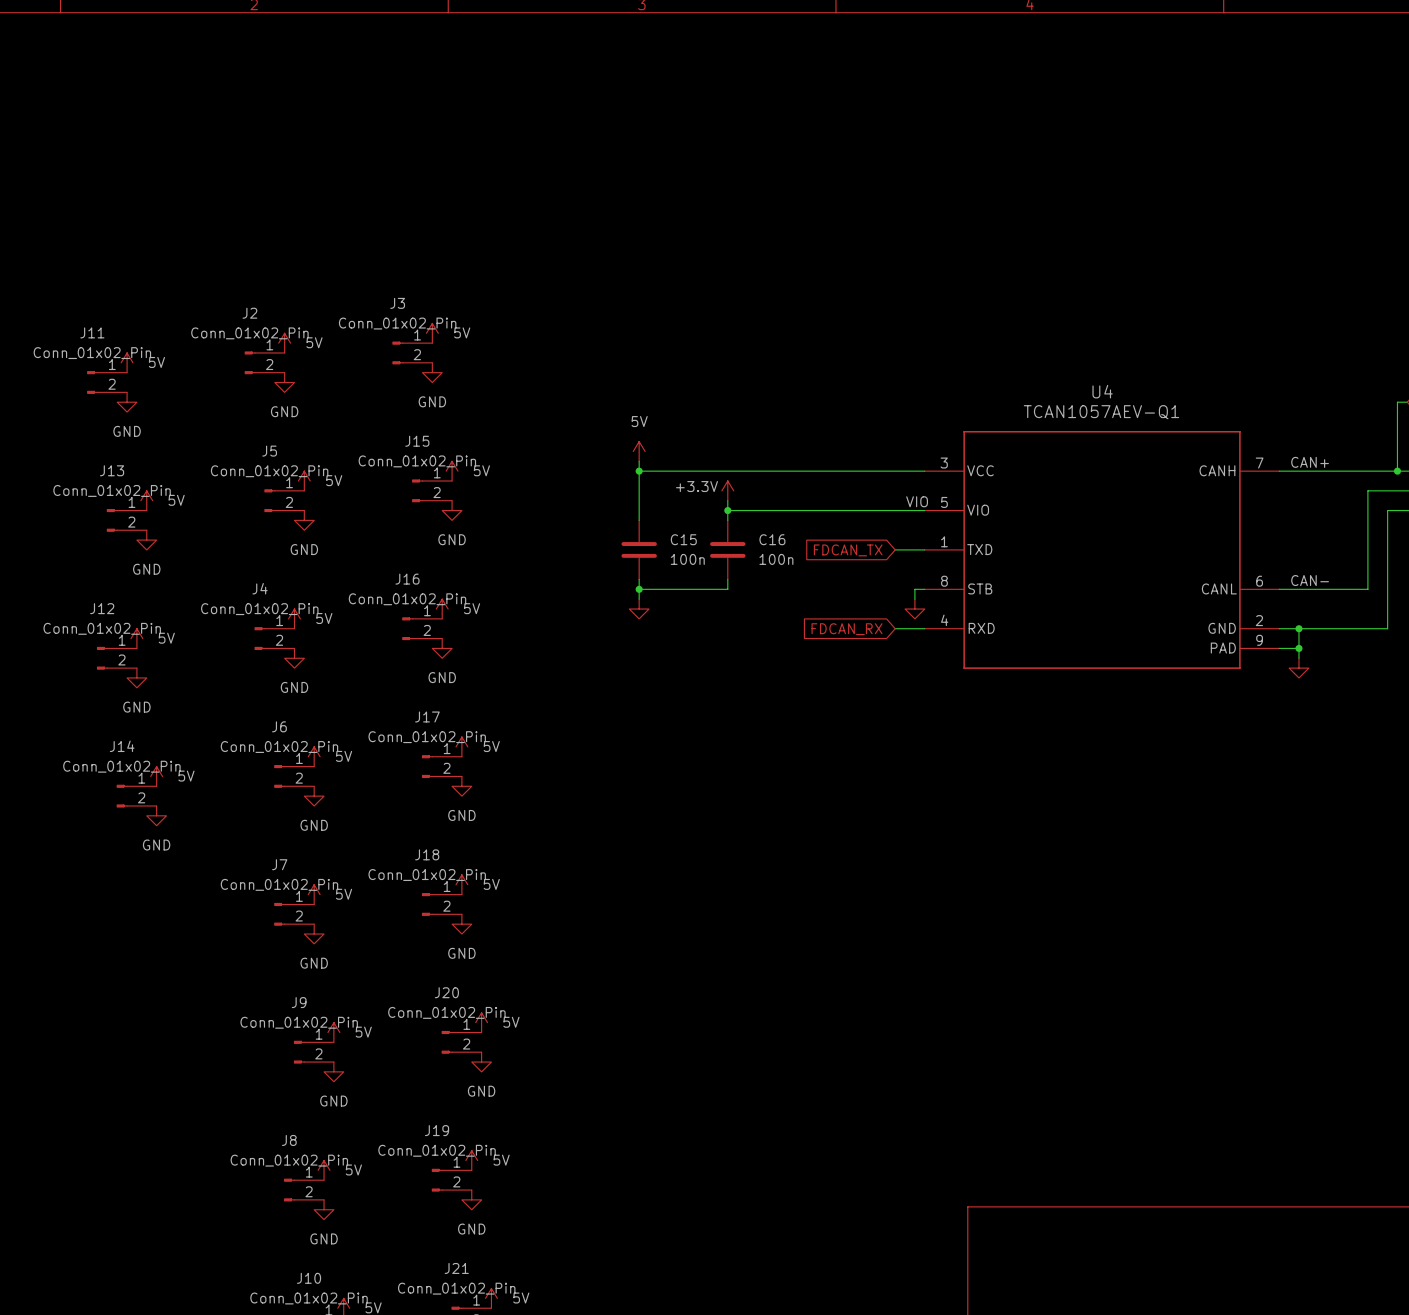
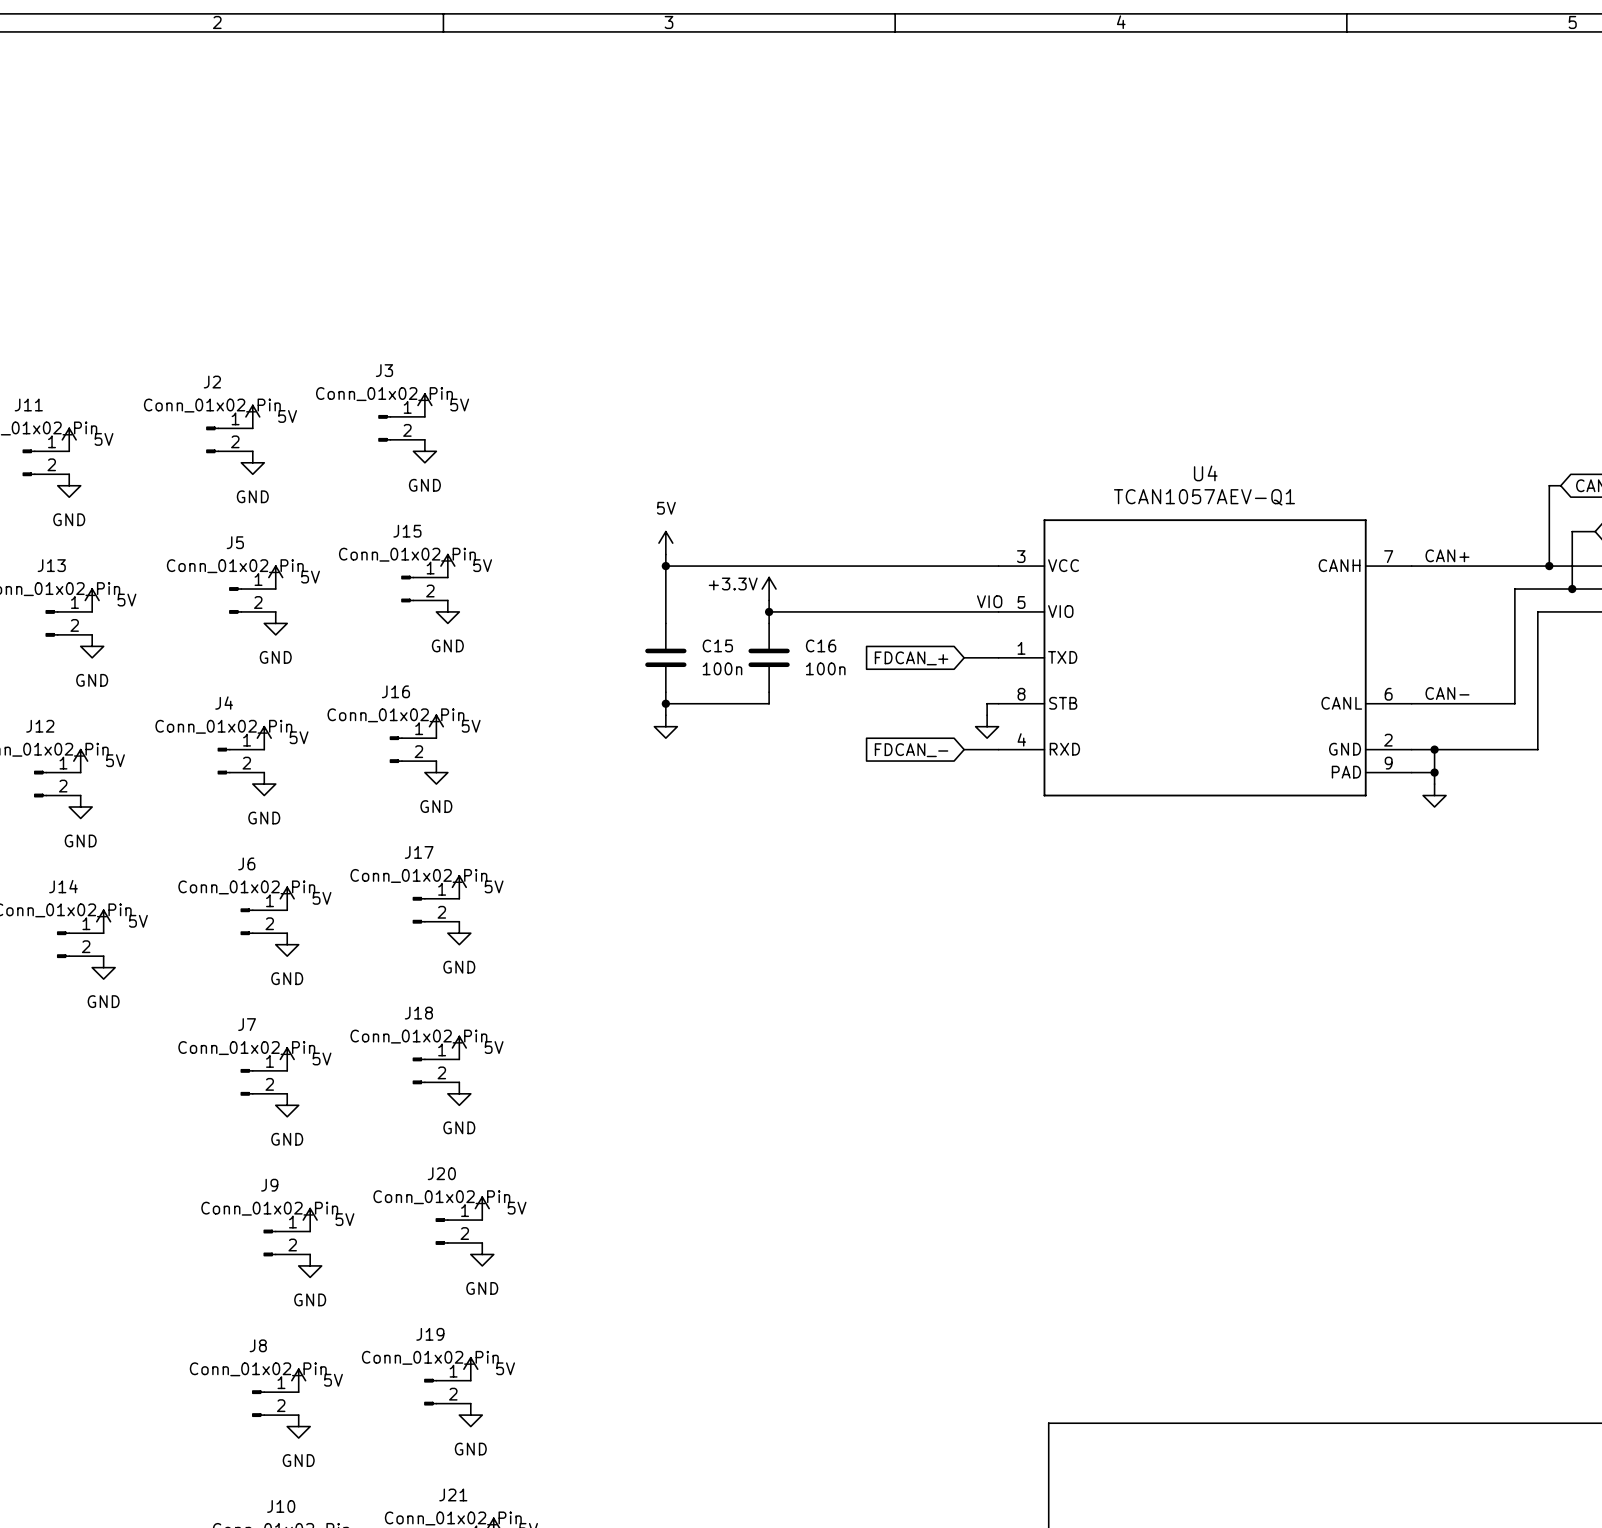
global label: FDCAN_TX (848, 550) -> FDCAN_+ (911, 658)
global label: FDCAN_RX (847, 629) -> FDCAN_- (911, 750)

